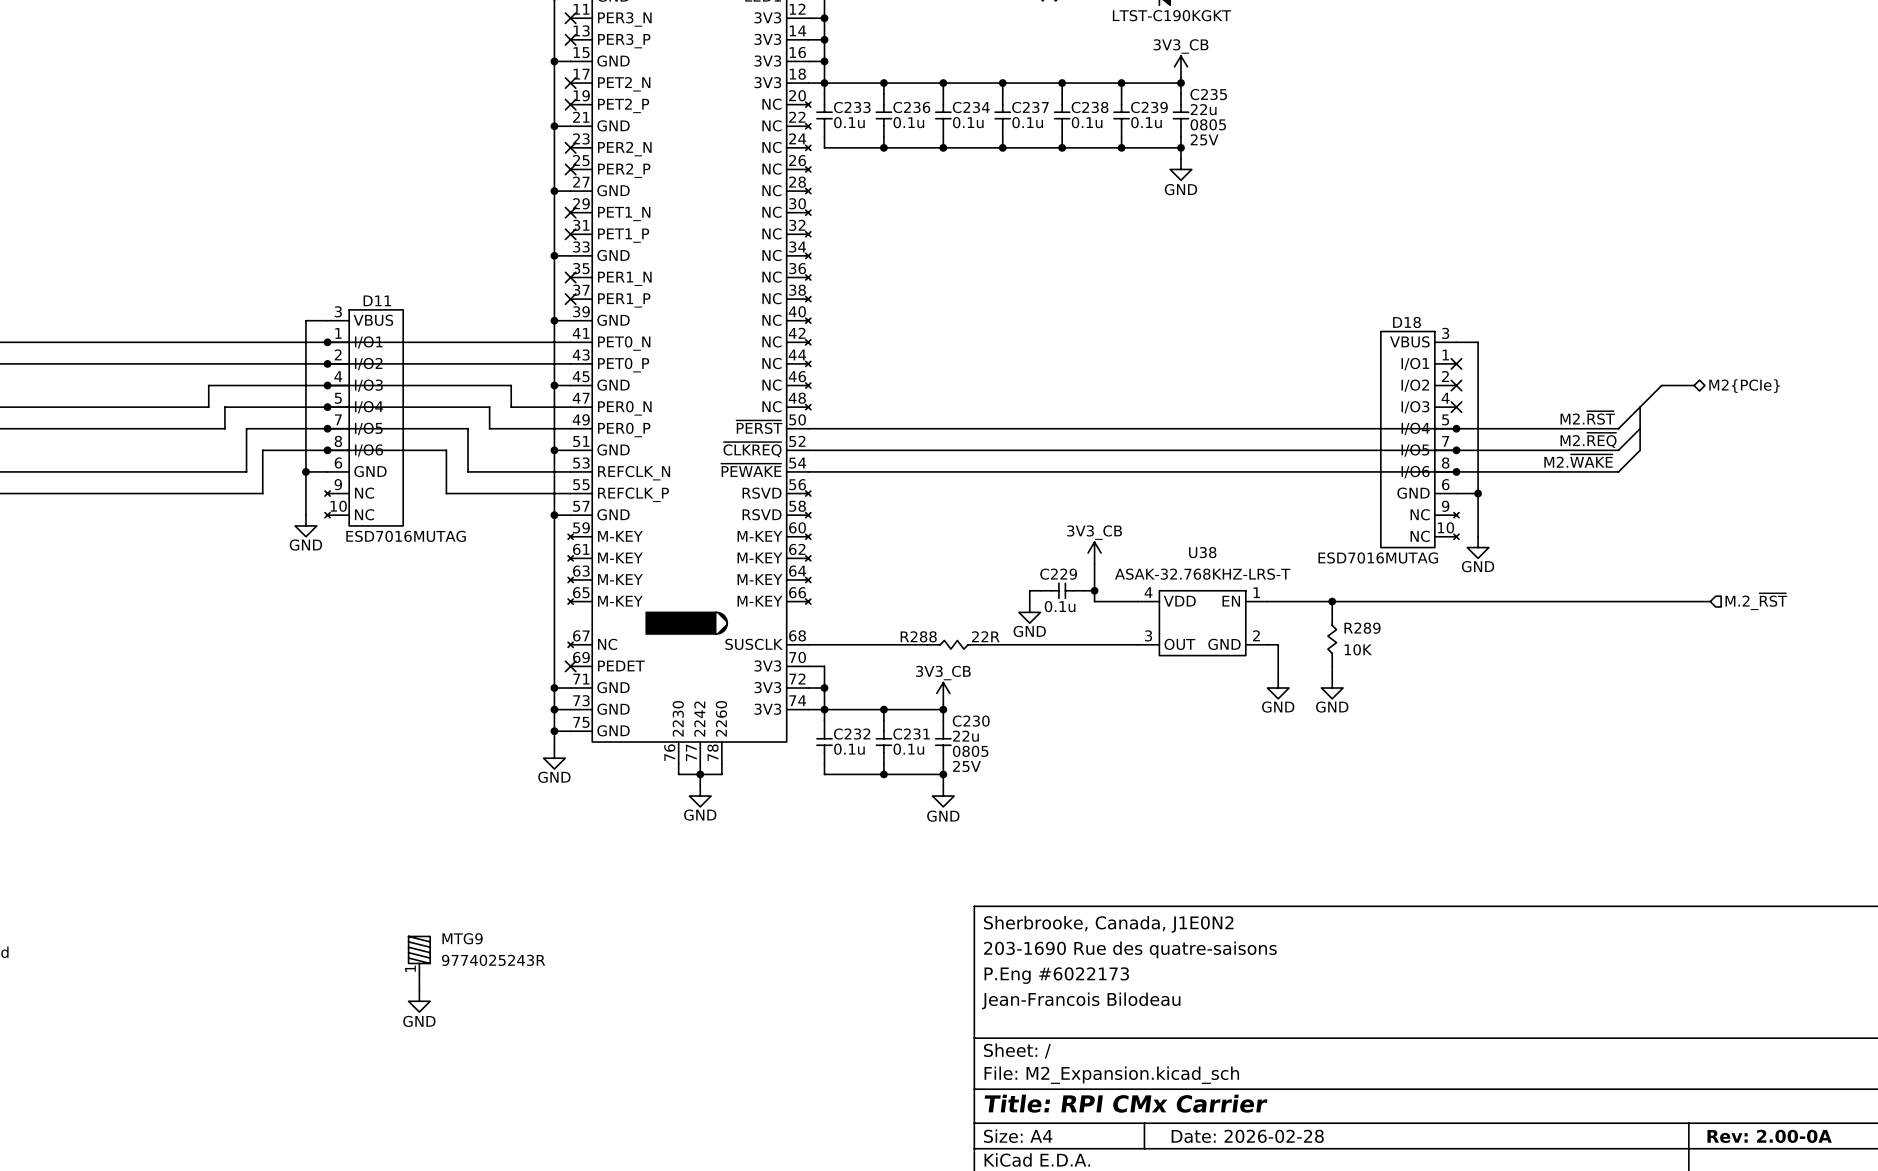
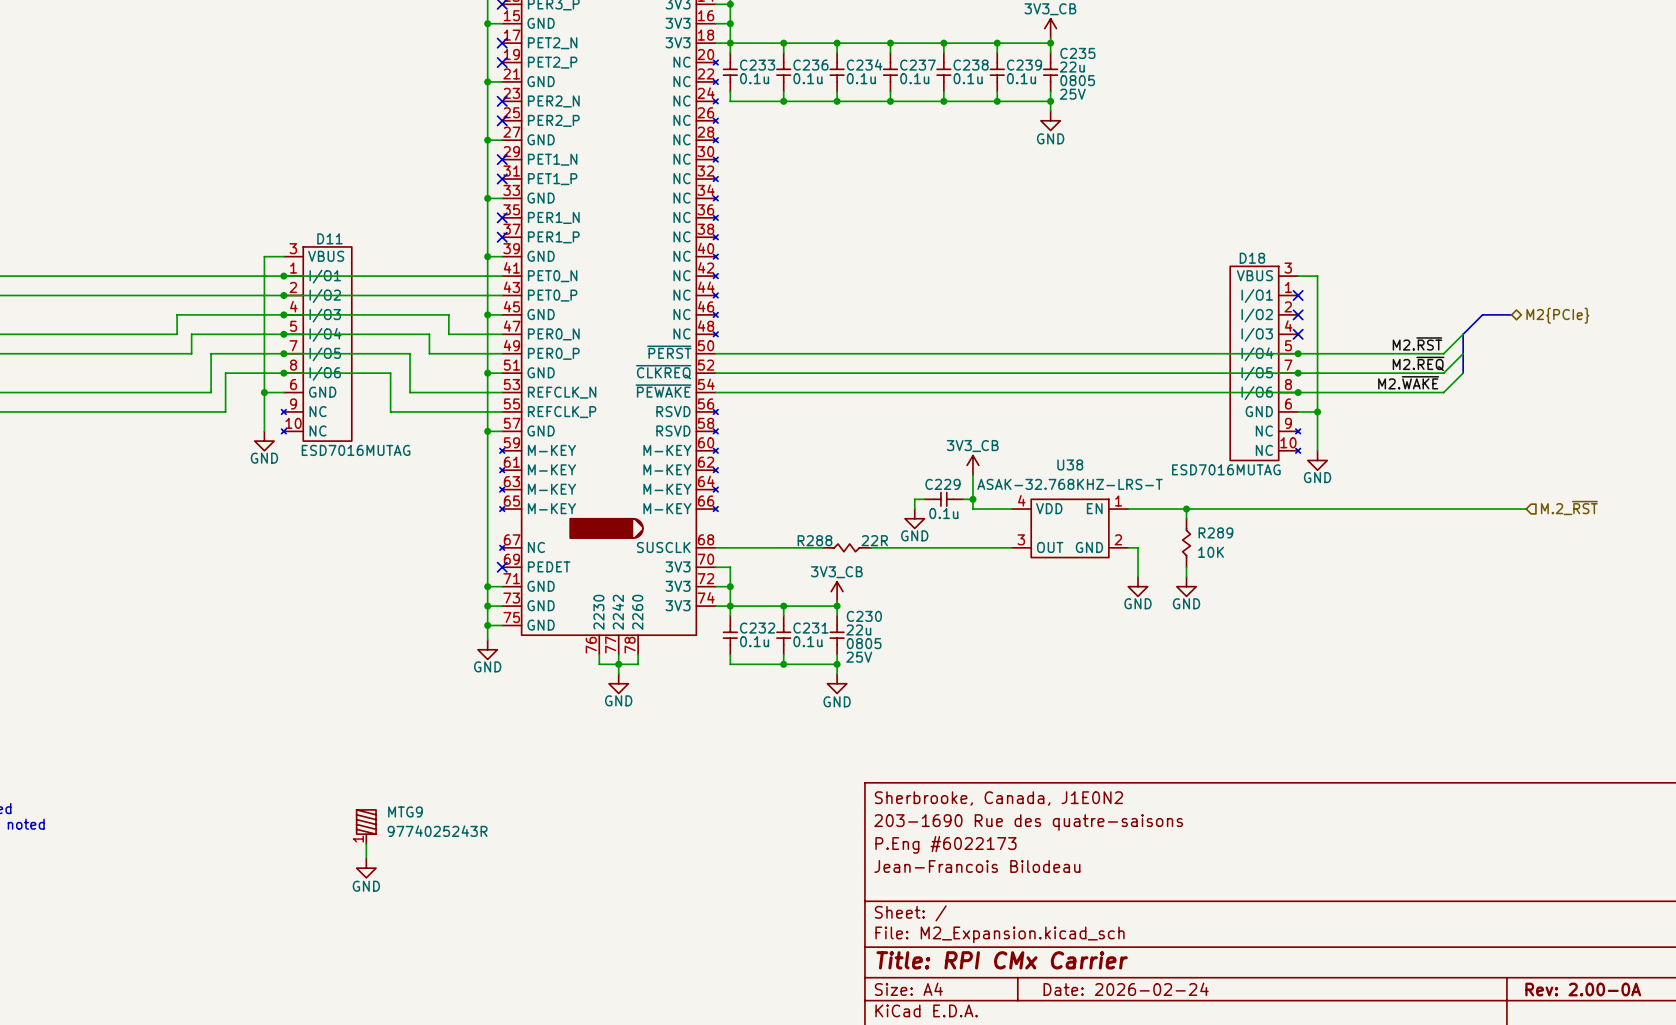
title block: Date: 2026-02-28 (1247, 1136) -> Date: 2026-02-24 (1126, 989)

